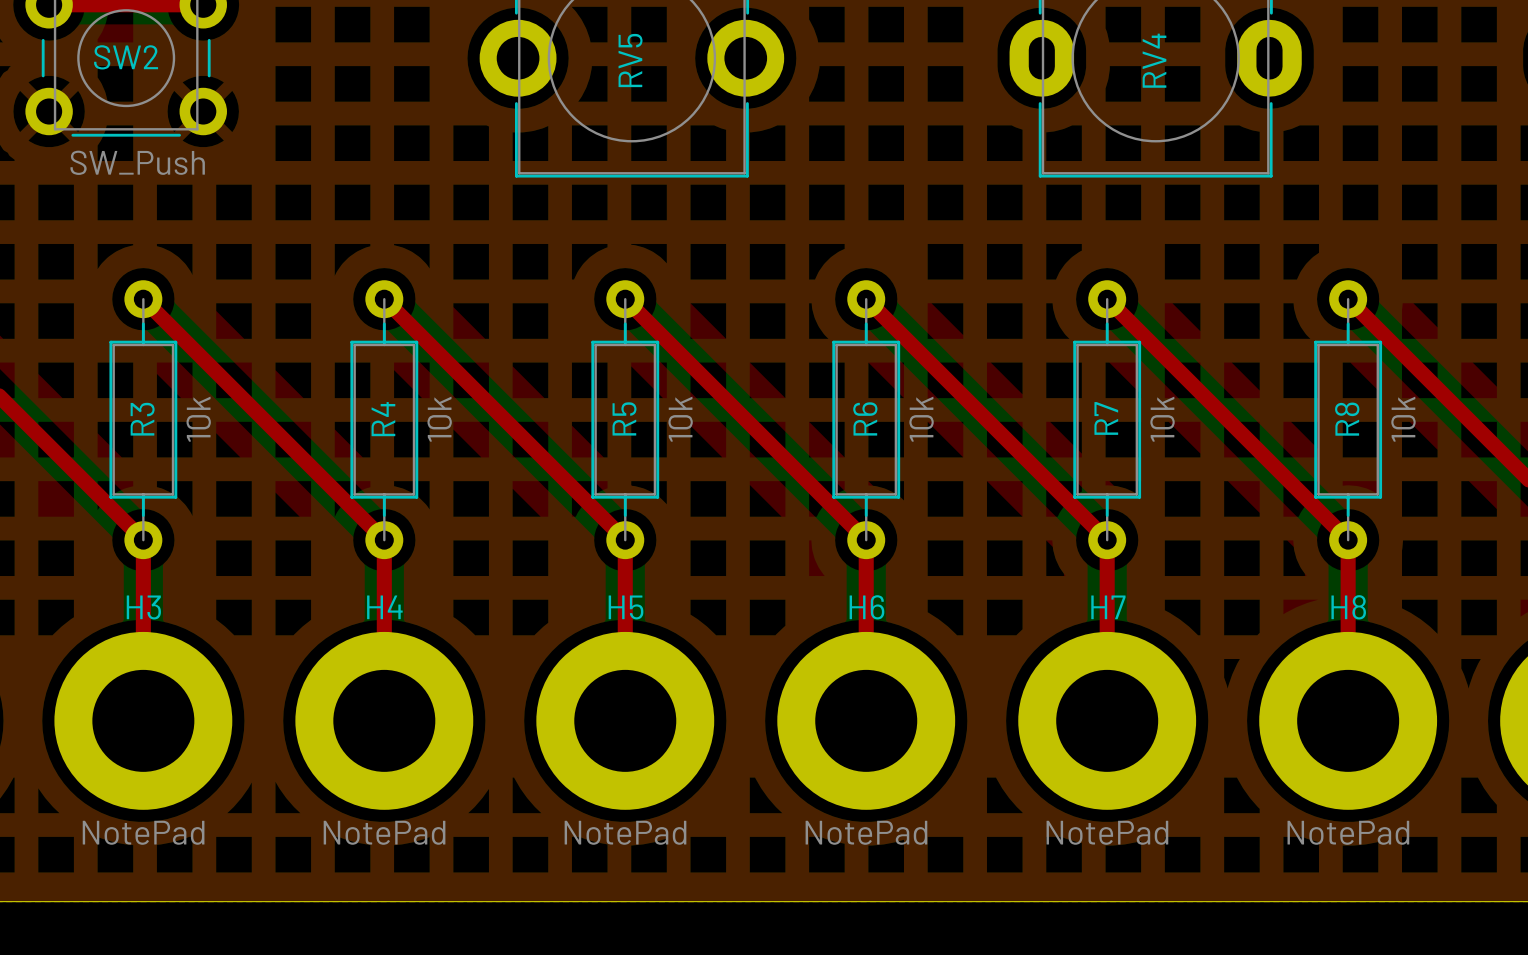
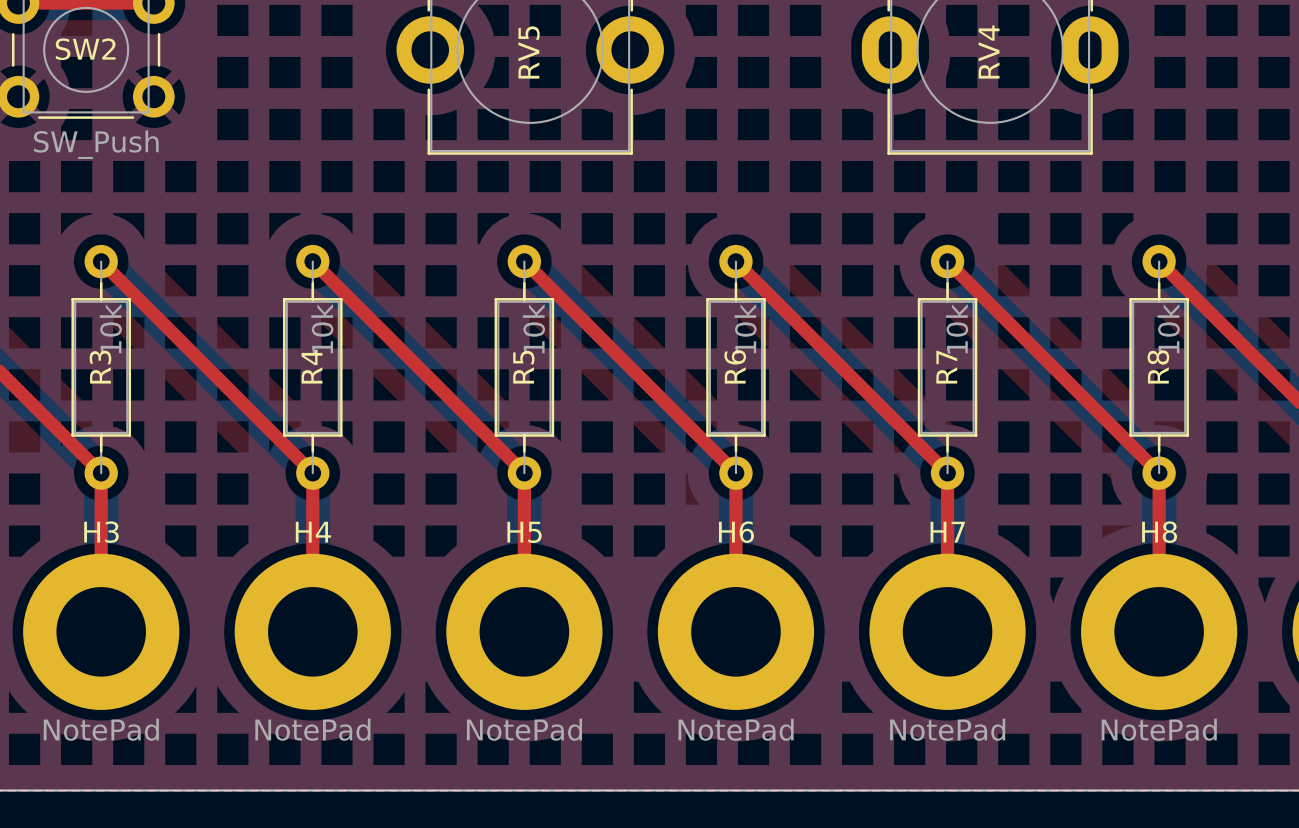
R3 value position: 10k (198, 419) -> 10k (110, 328)
R4 value position: 10k (439, 419) -> 10k (322, 328)
R5 value position: 10k (680, 419) -> 10k (533, 328)
R6 value position: 10k (921, 419) -> 10k (745, 328)
R7 value position: 10k (1162, 419) -> 10k (957, 328)
R8 value position: 10k (1403, 419) -> 10k (1168, 328)

